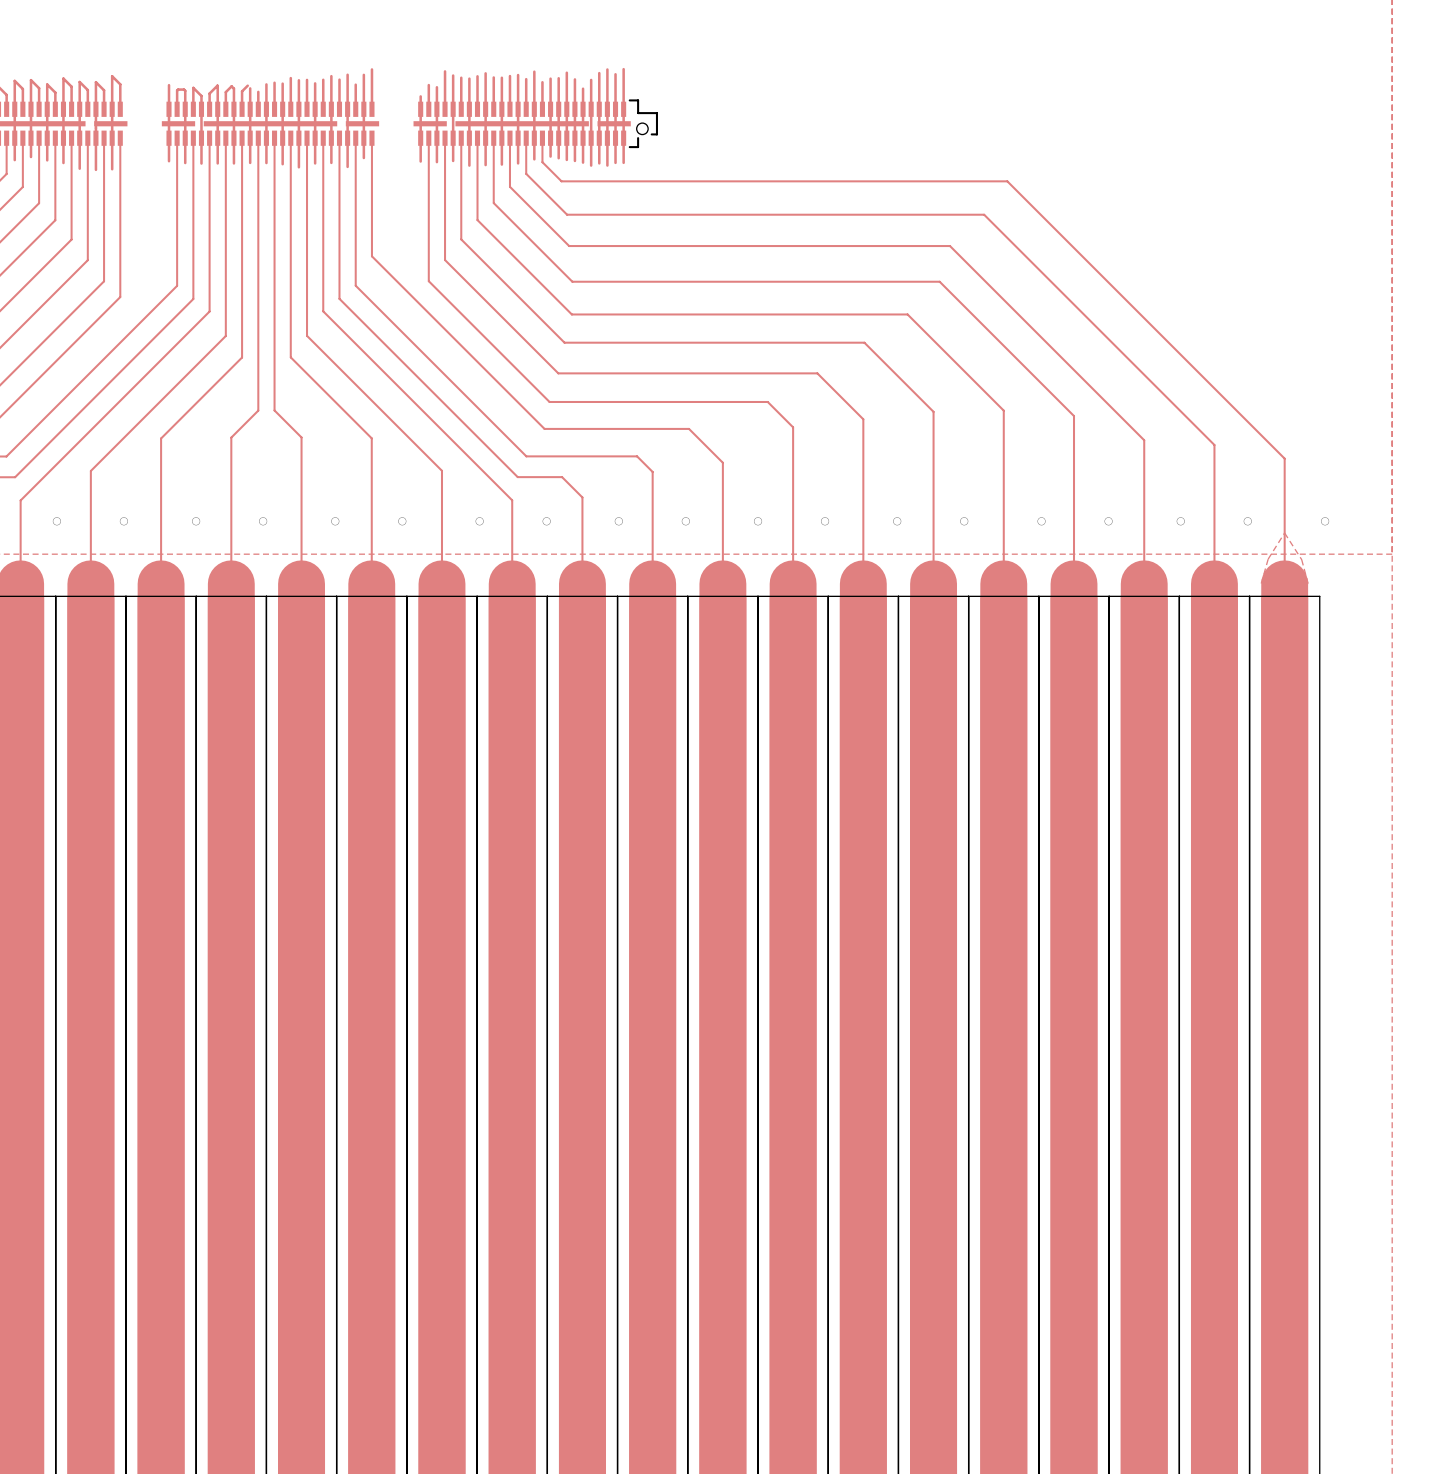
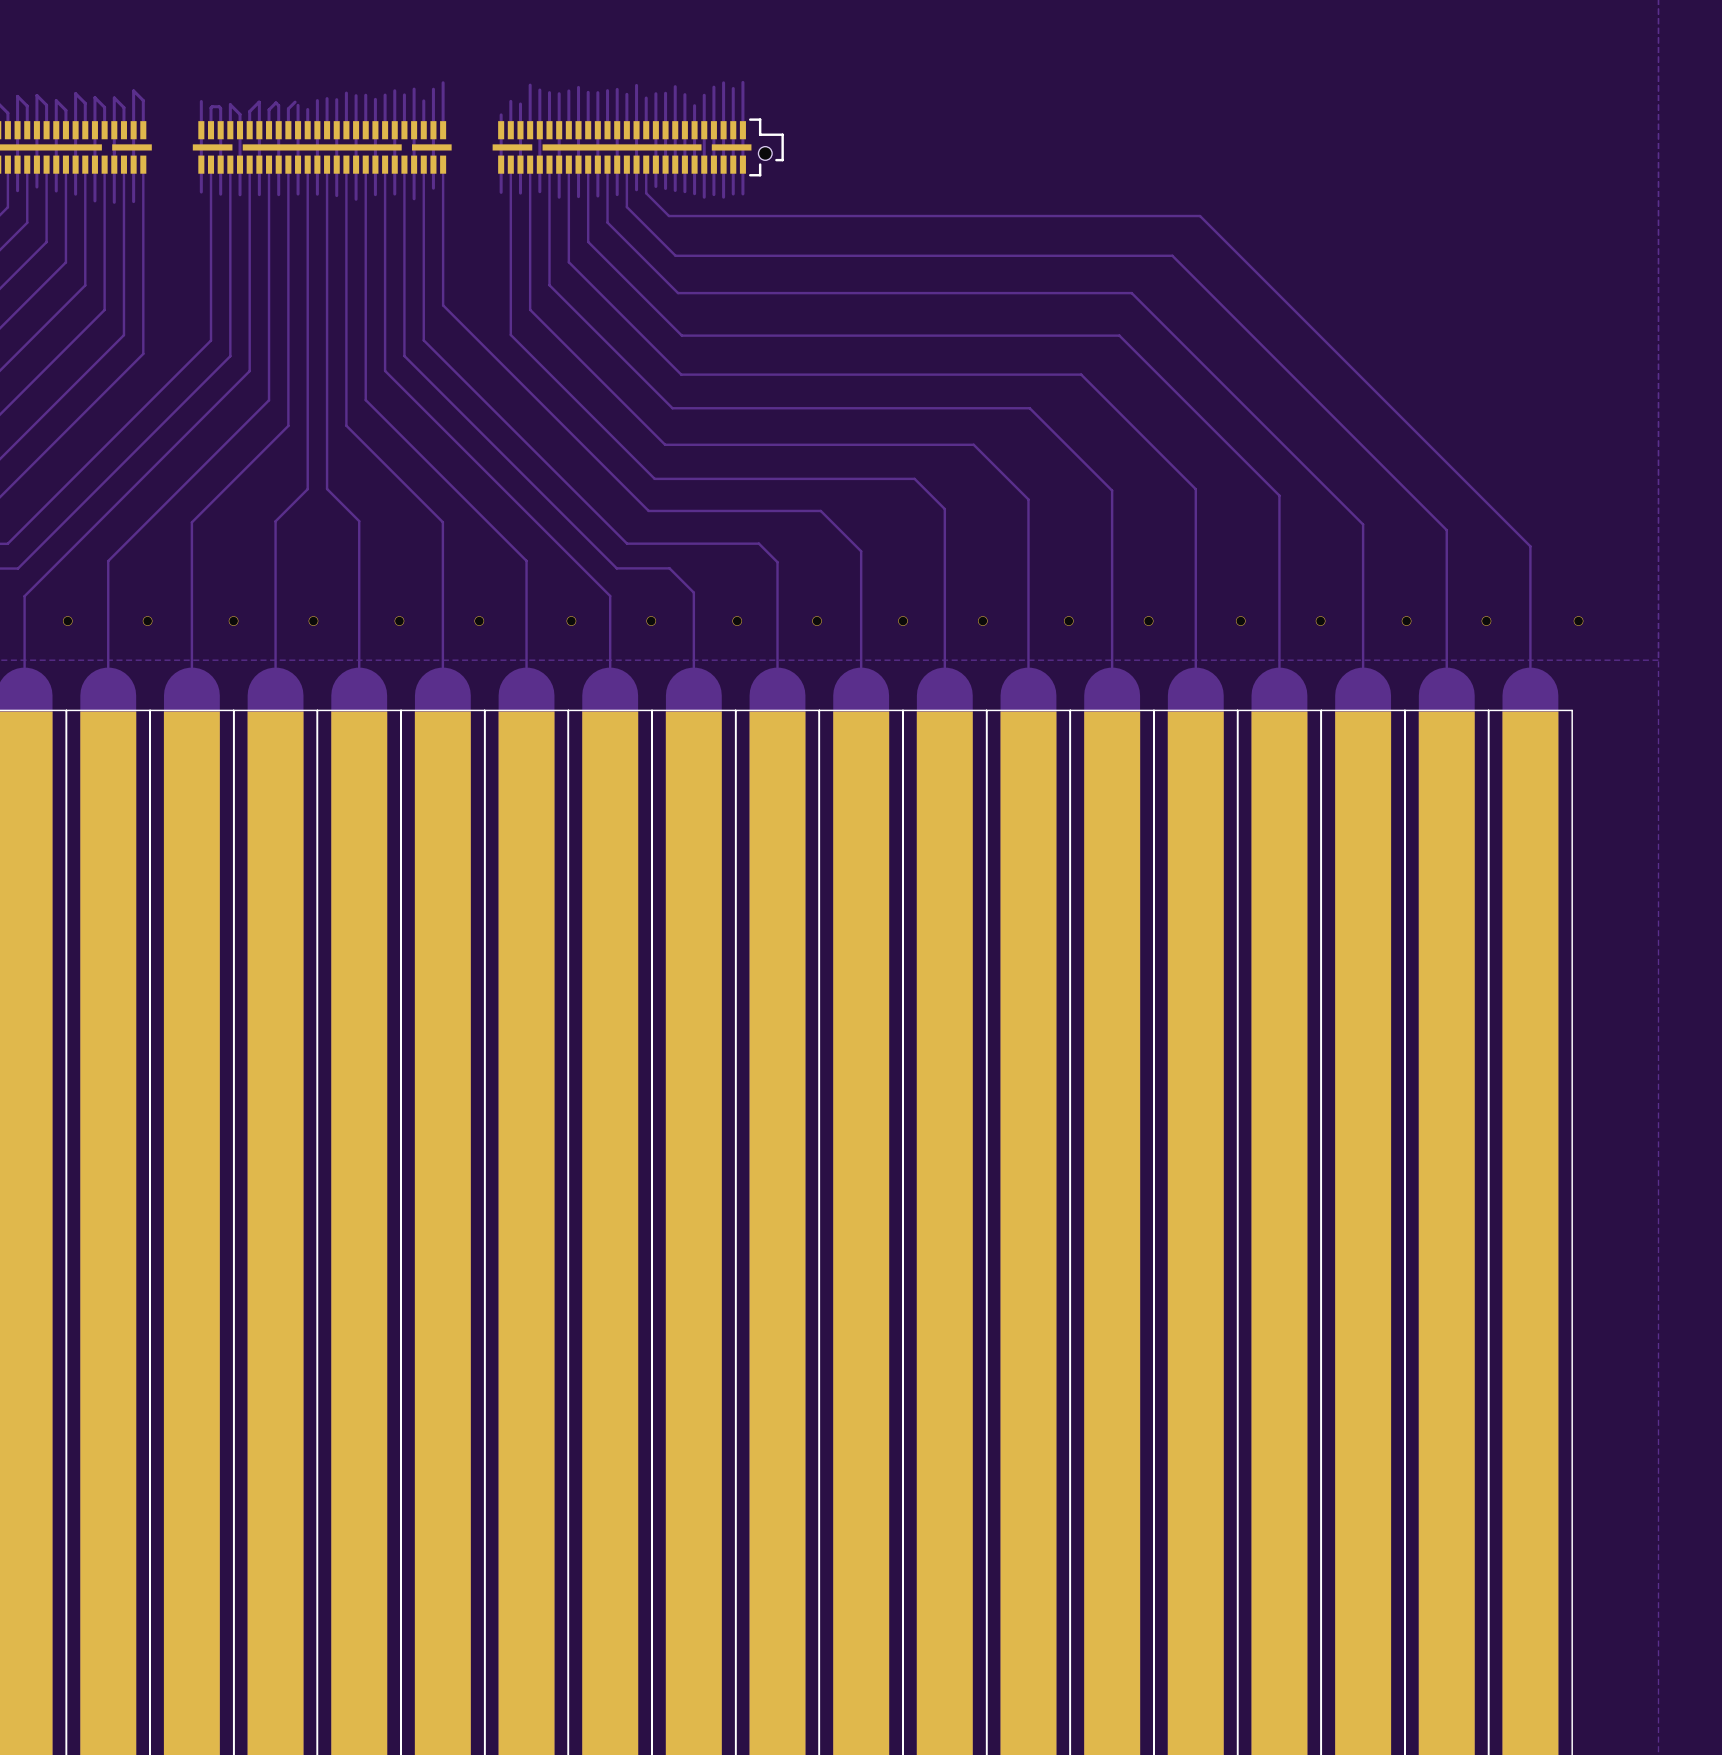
zone outline: (1284, 533) (1268, 559) (1261, 583) (1308, 583) (1301, 559) (1284, 533) -> none

